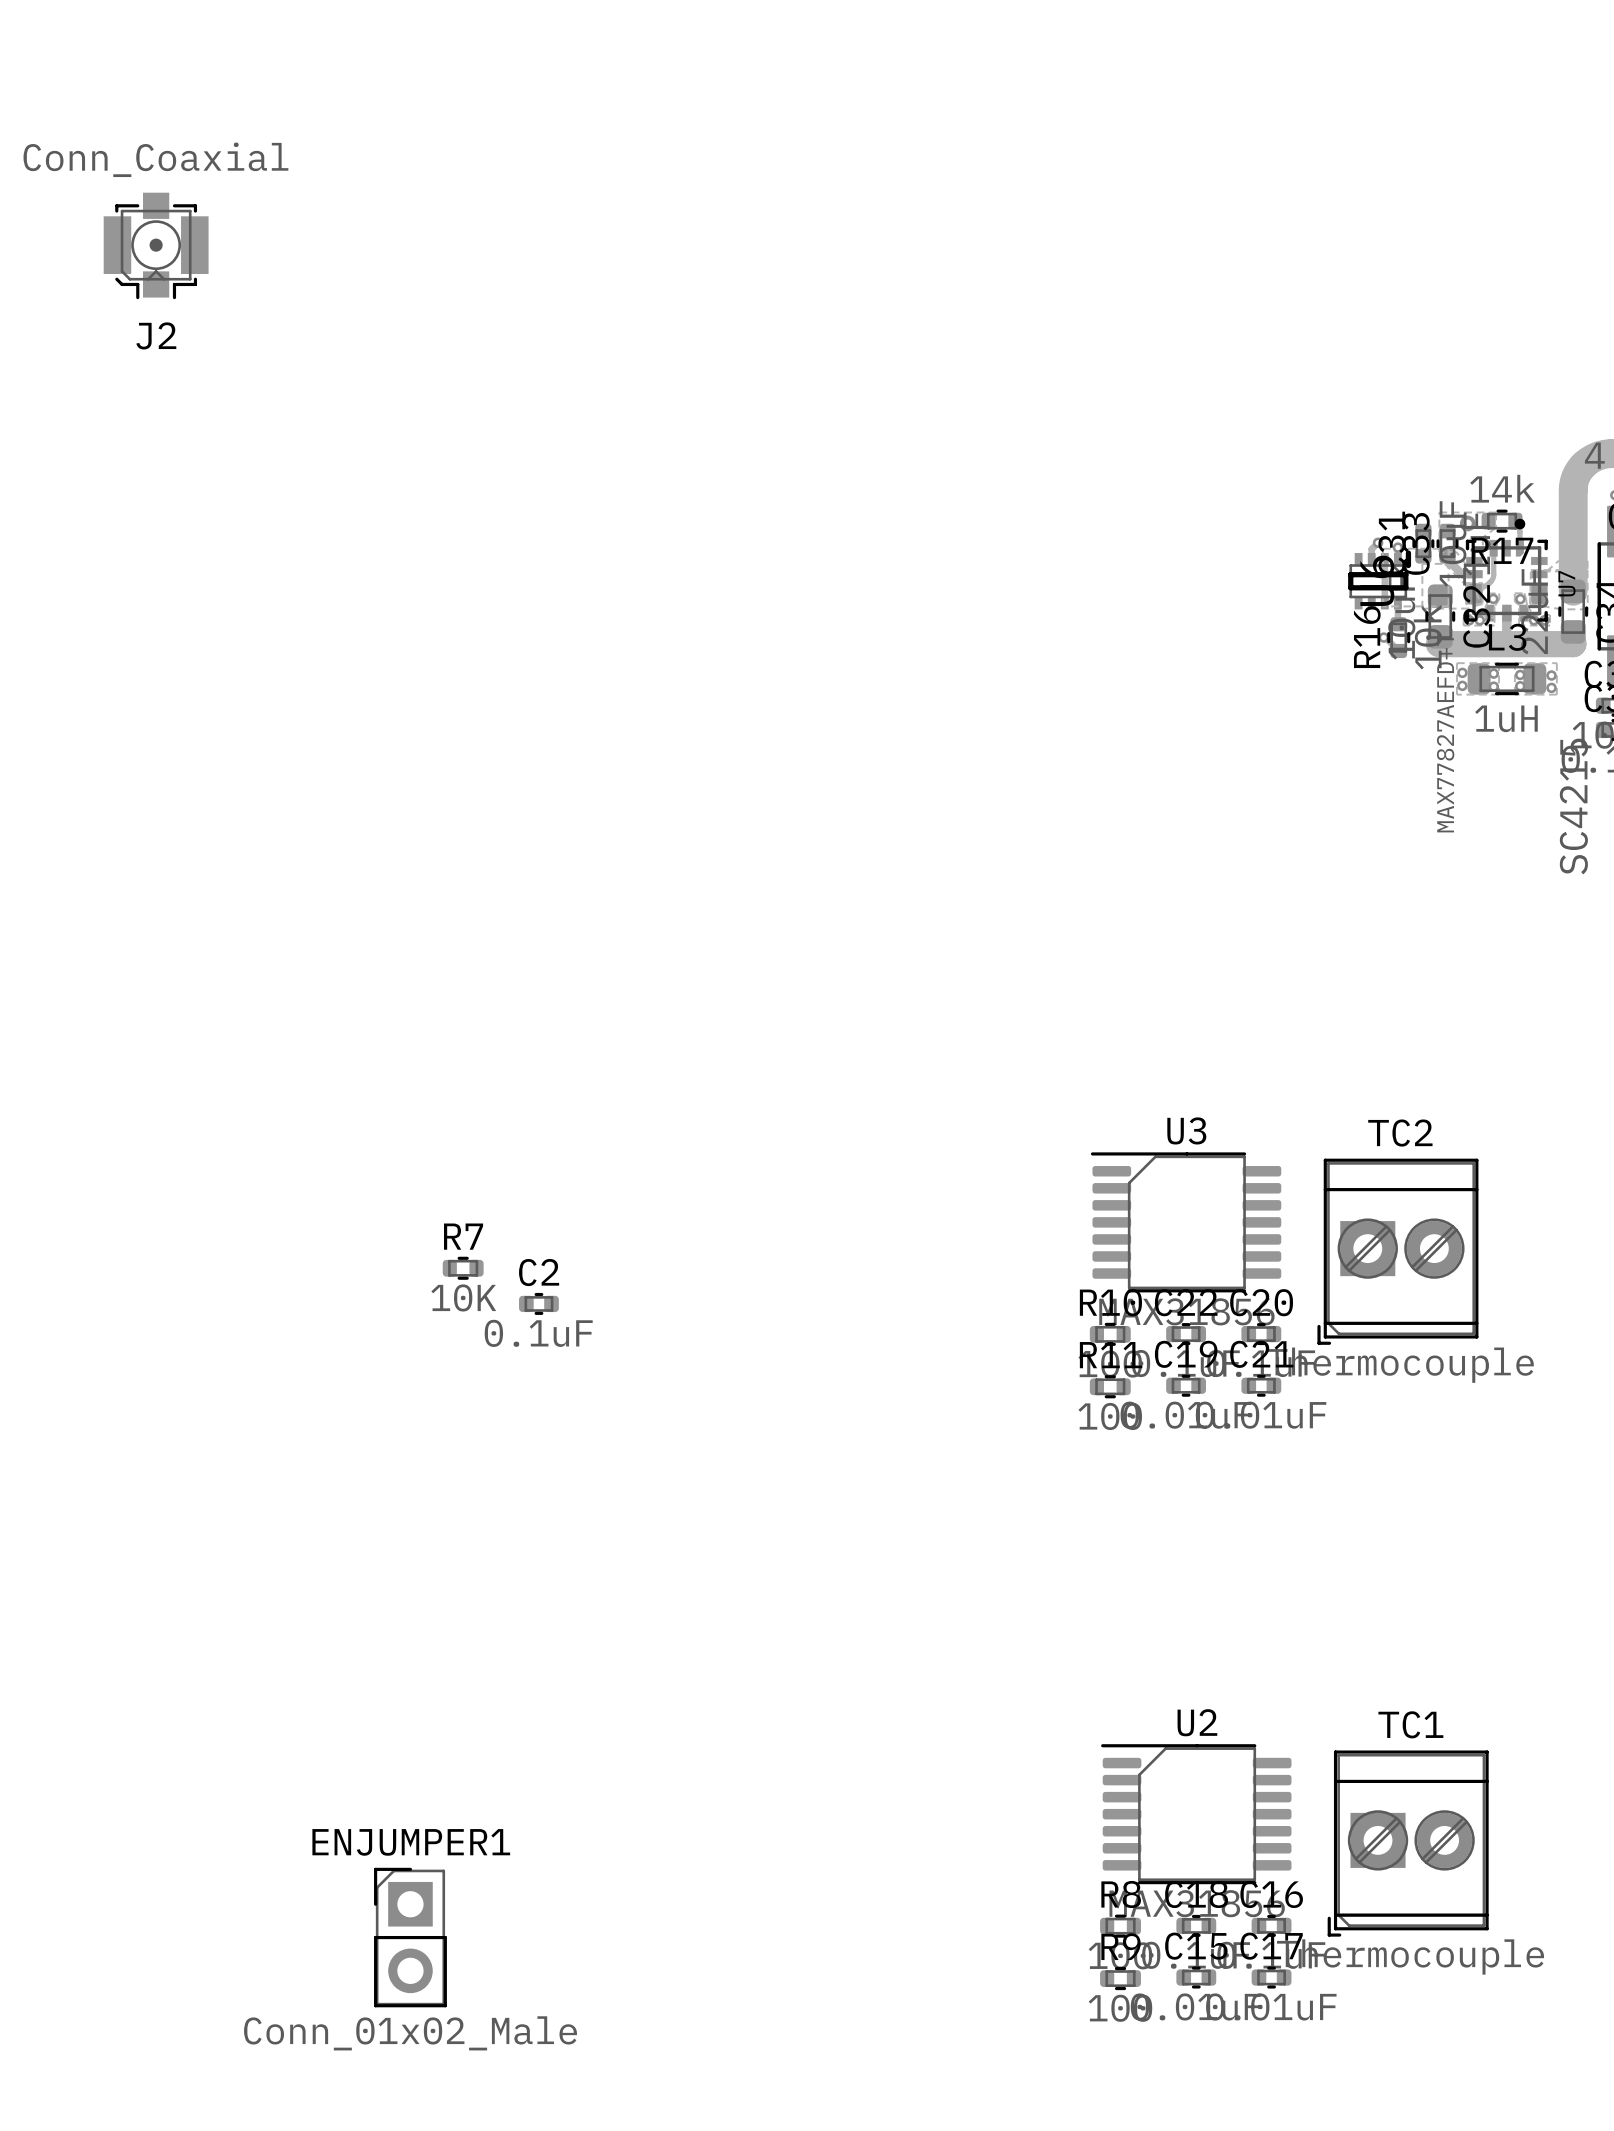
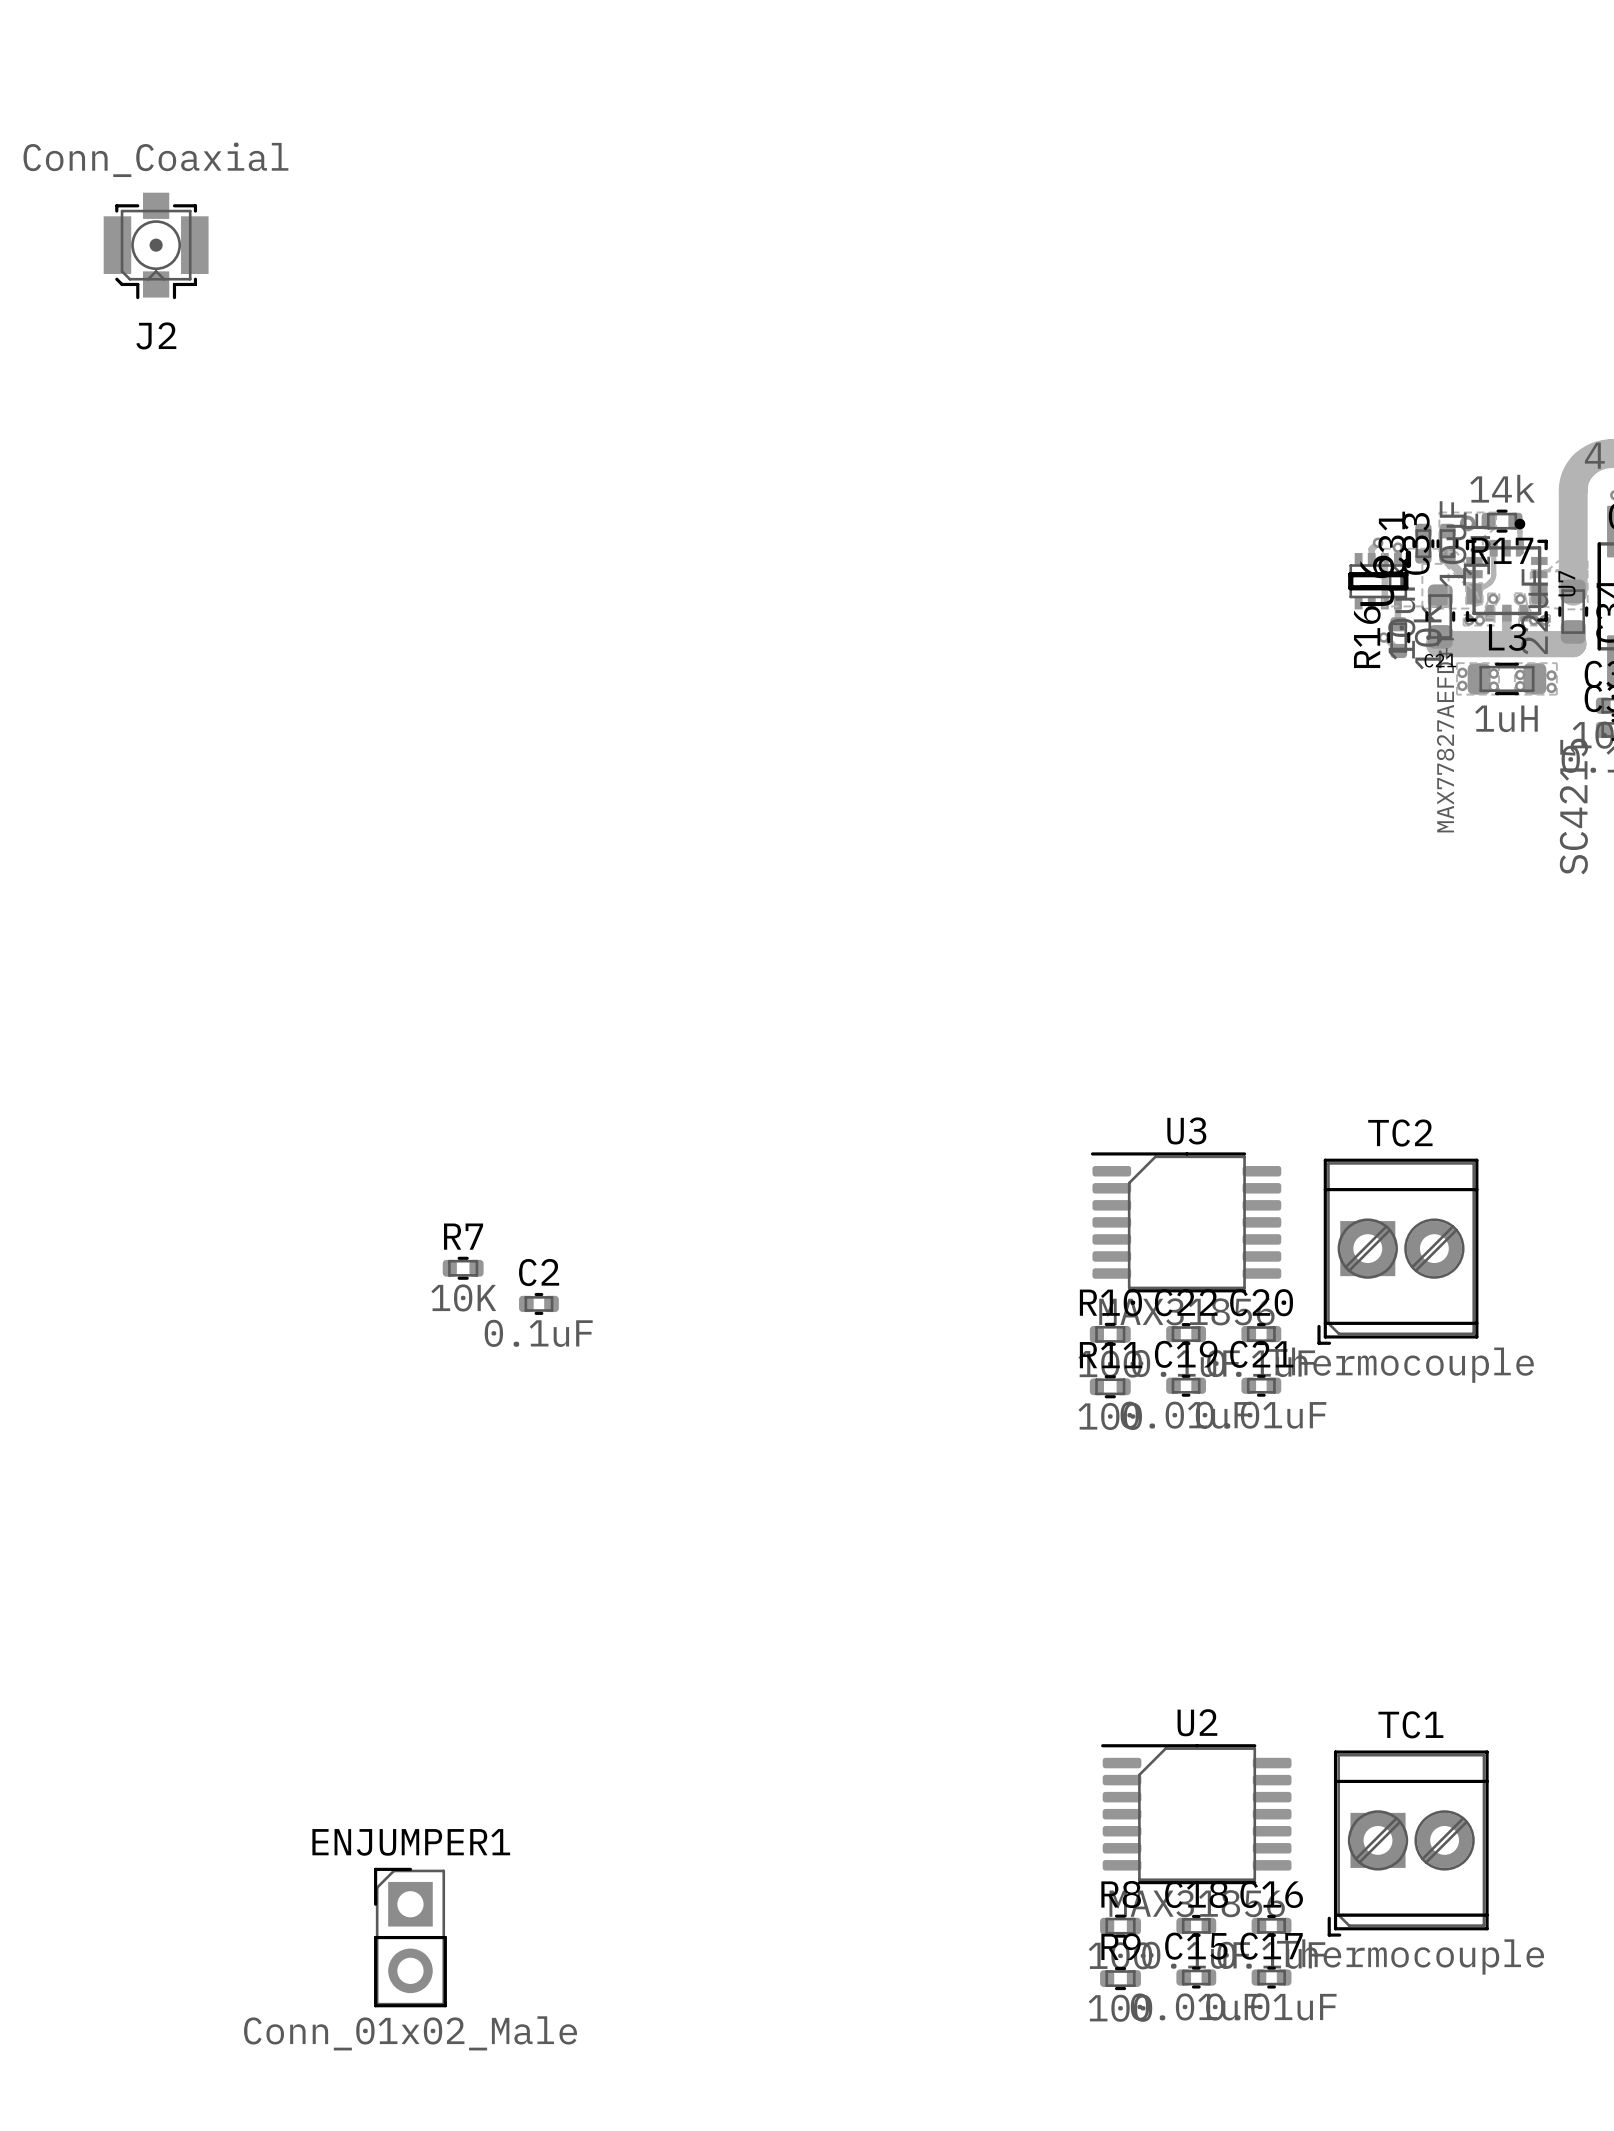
C32 name: C32 (1476, 616) -> C21 (1440, 660)

